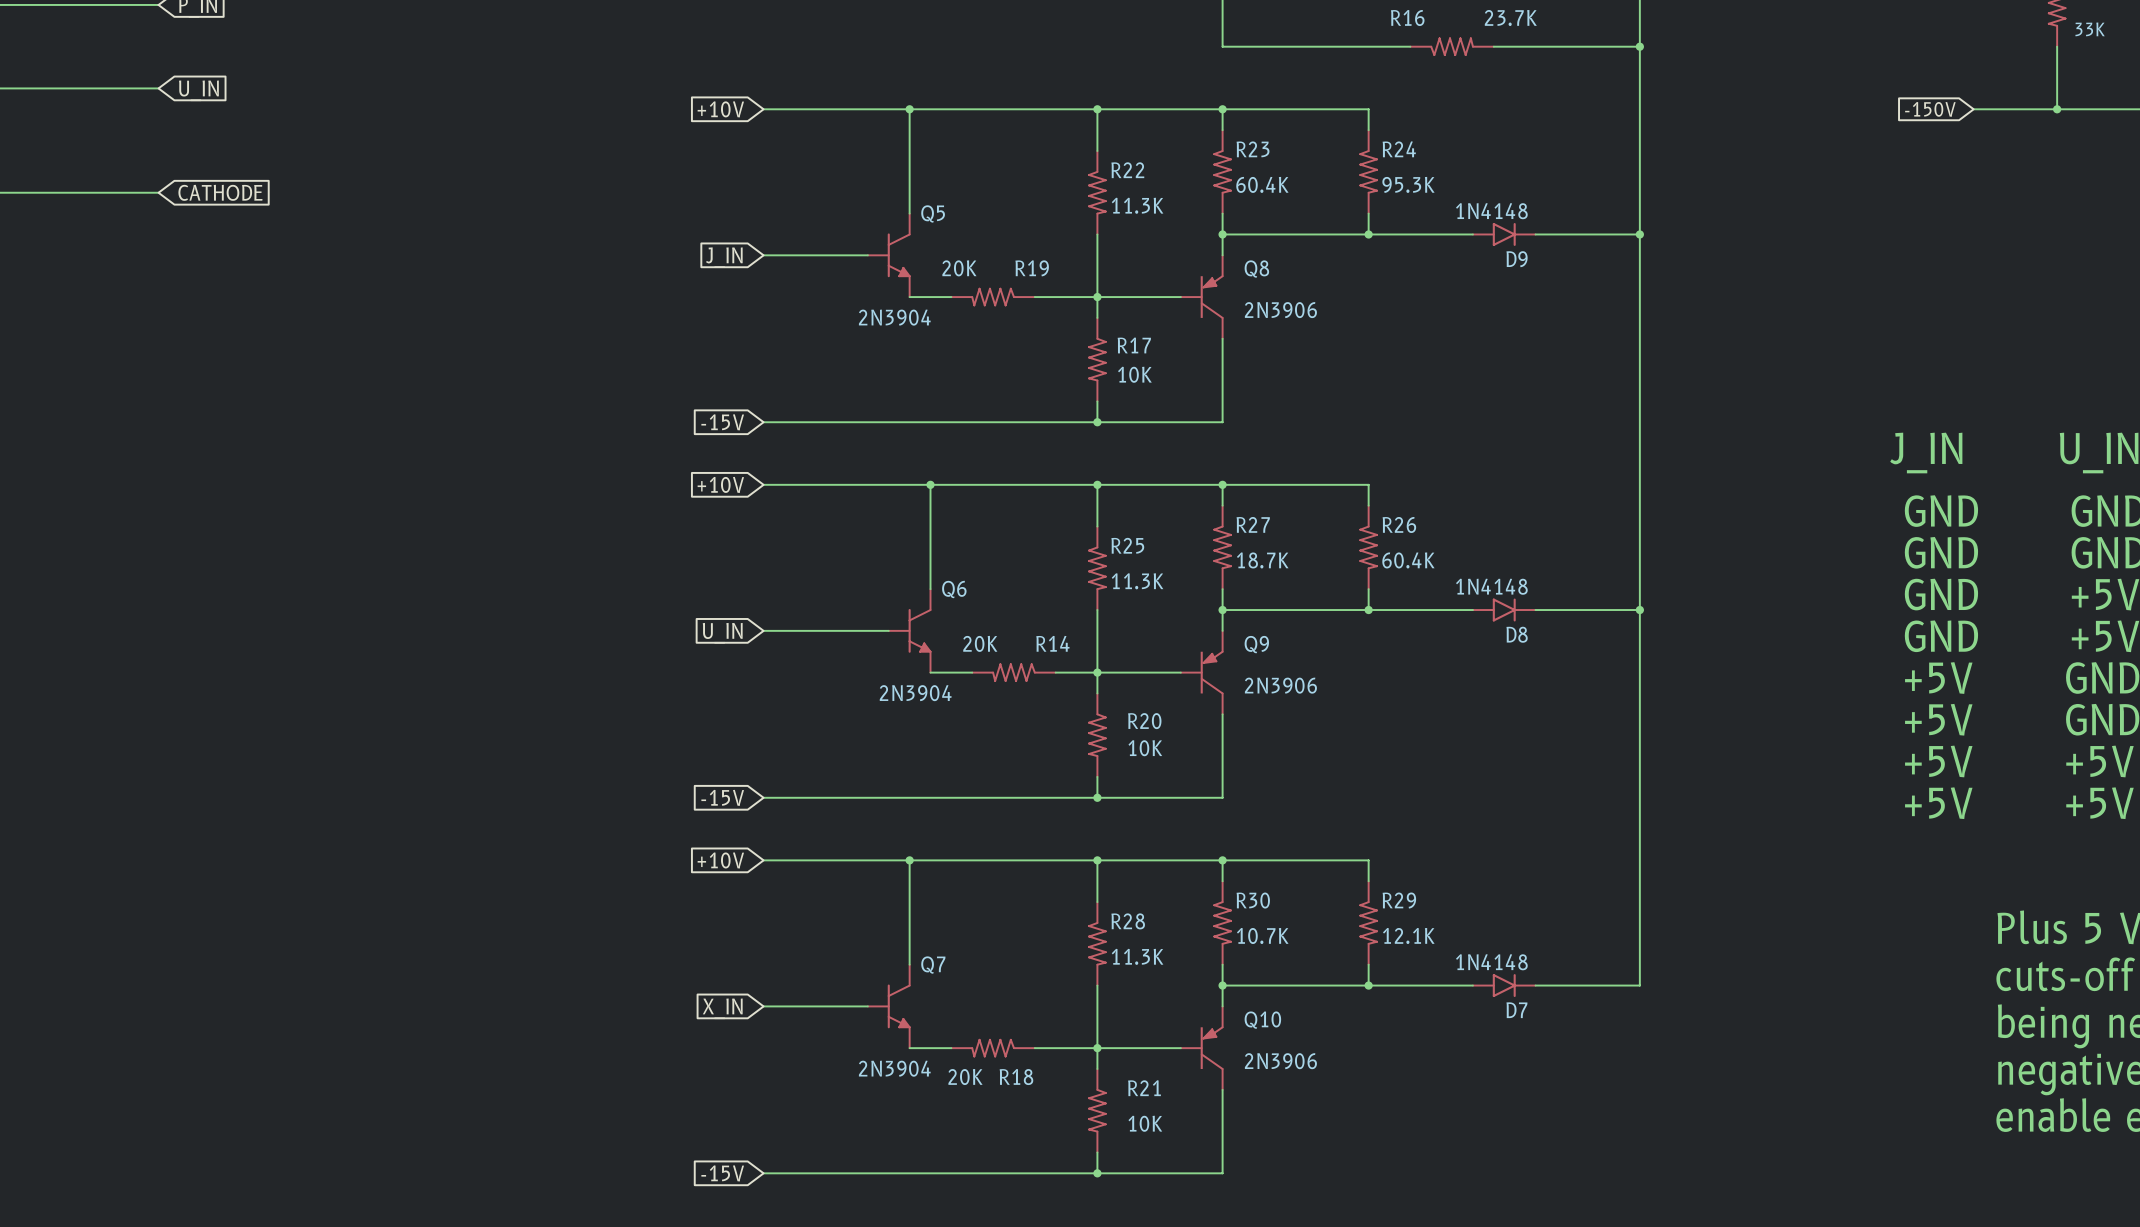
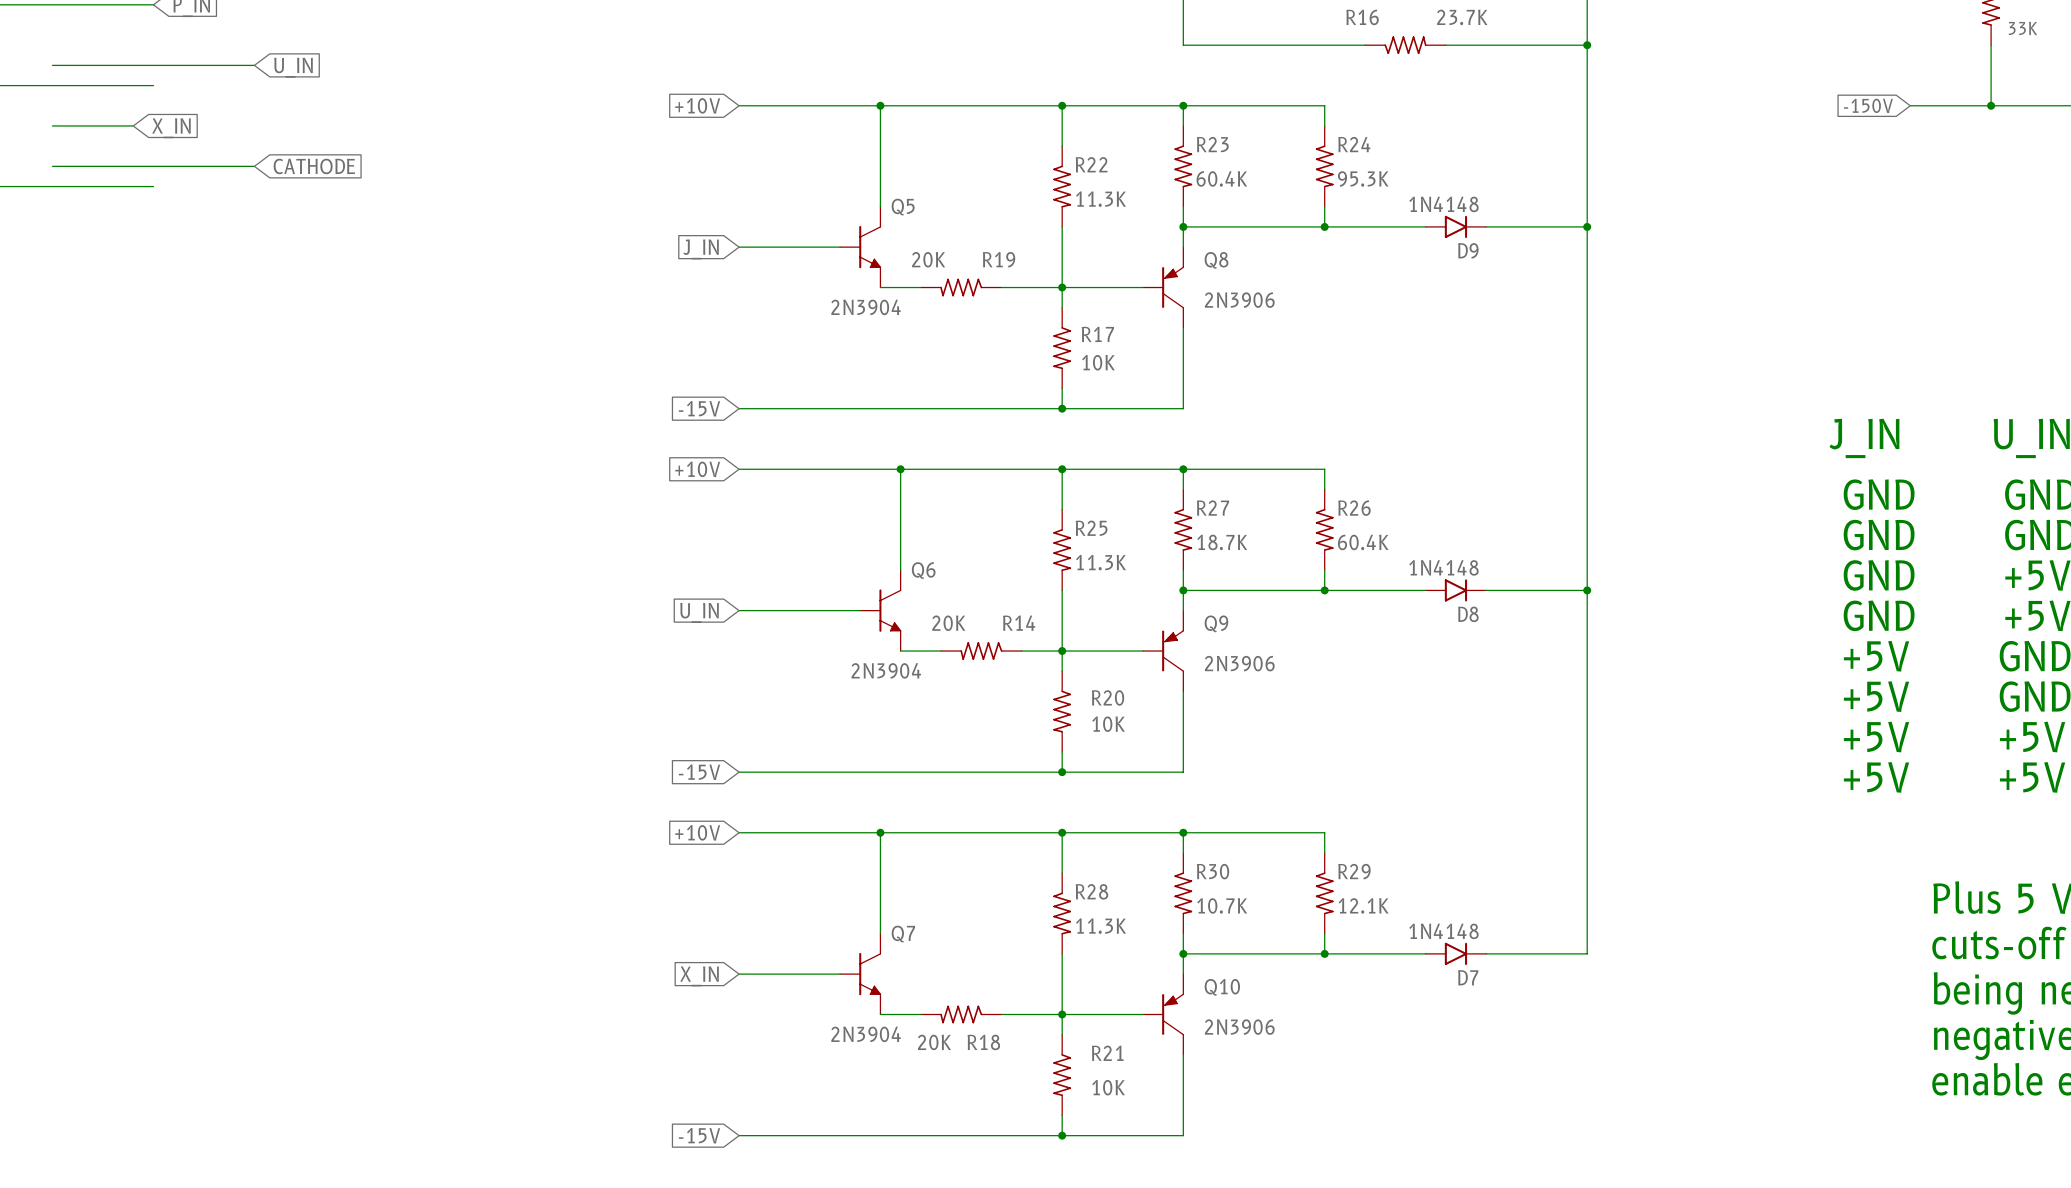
wire: none -> (52, 65) (254, 65)
global label position: U_IN (198, 90) -> U_IN (293, 67)
wire: none -> (52, 125) (133, 125)
global label: none -> X_IN (171, 128)
wire: none -> (52, 166) (254, 166)
global label position: CATHODE (220, 192) -> CATHODE (314, 166)

